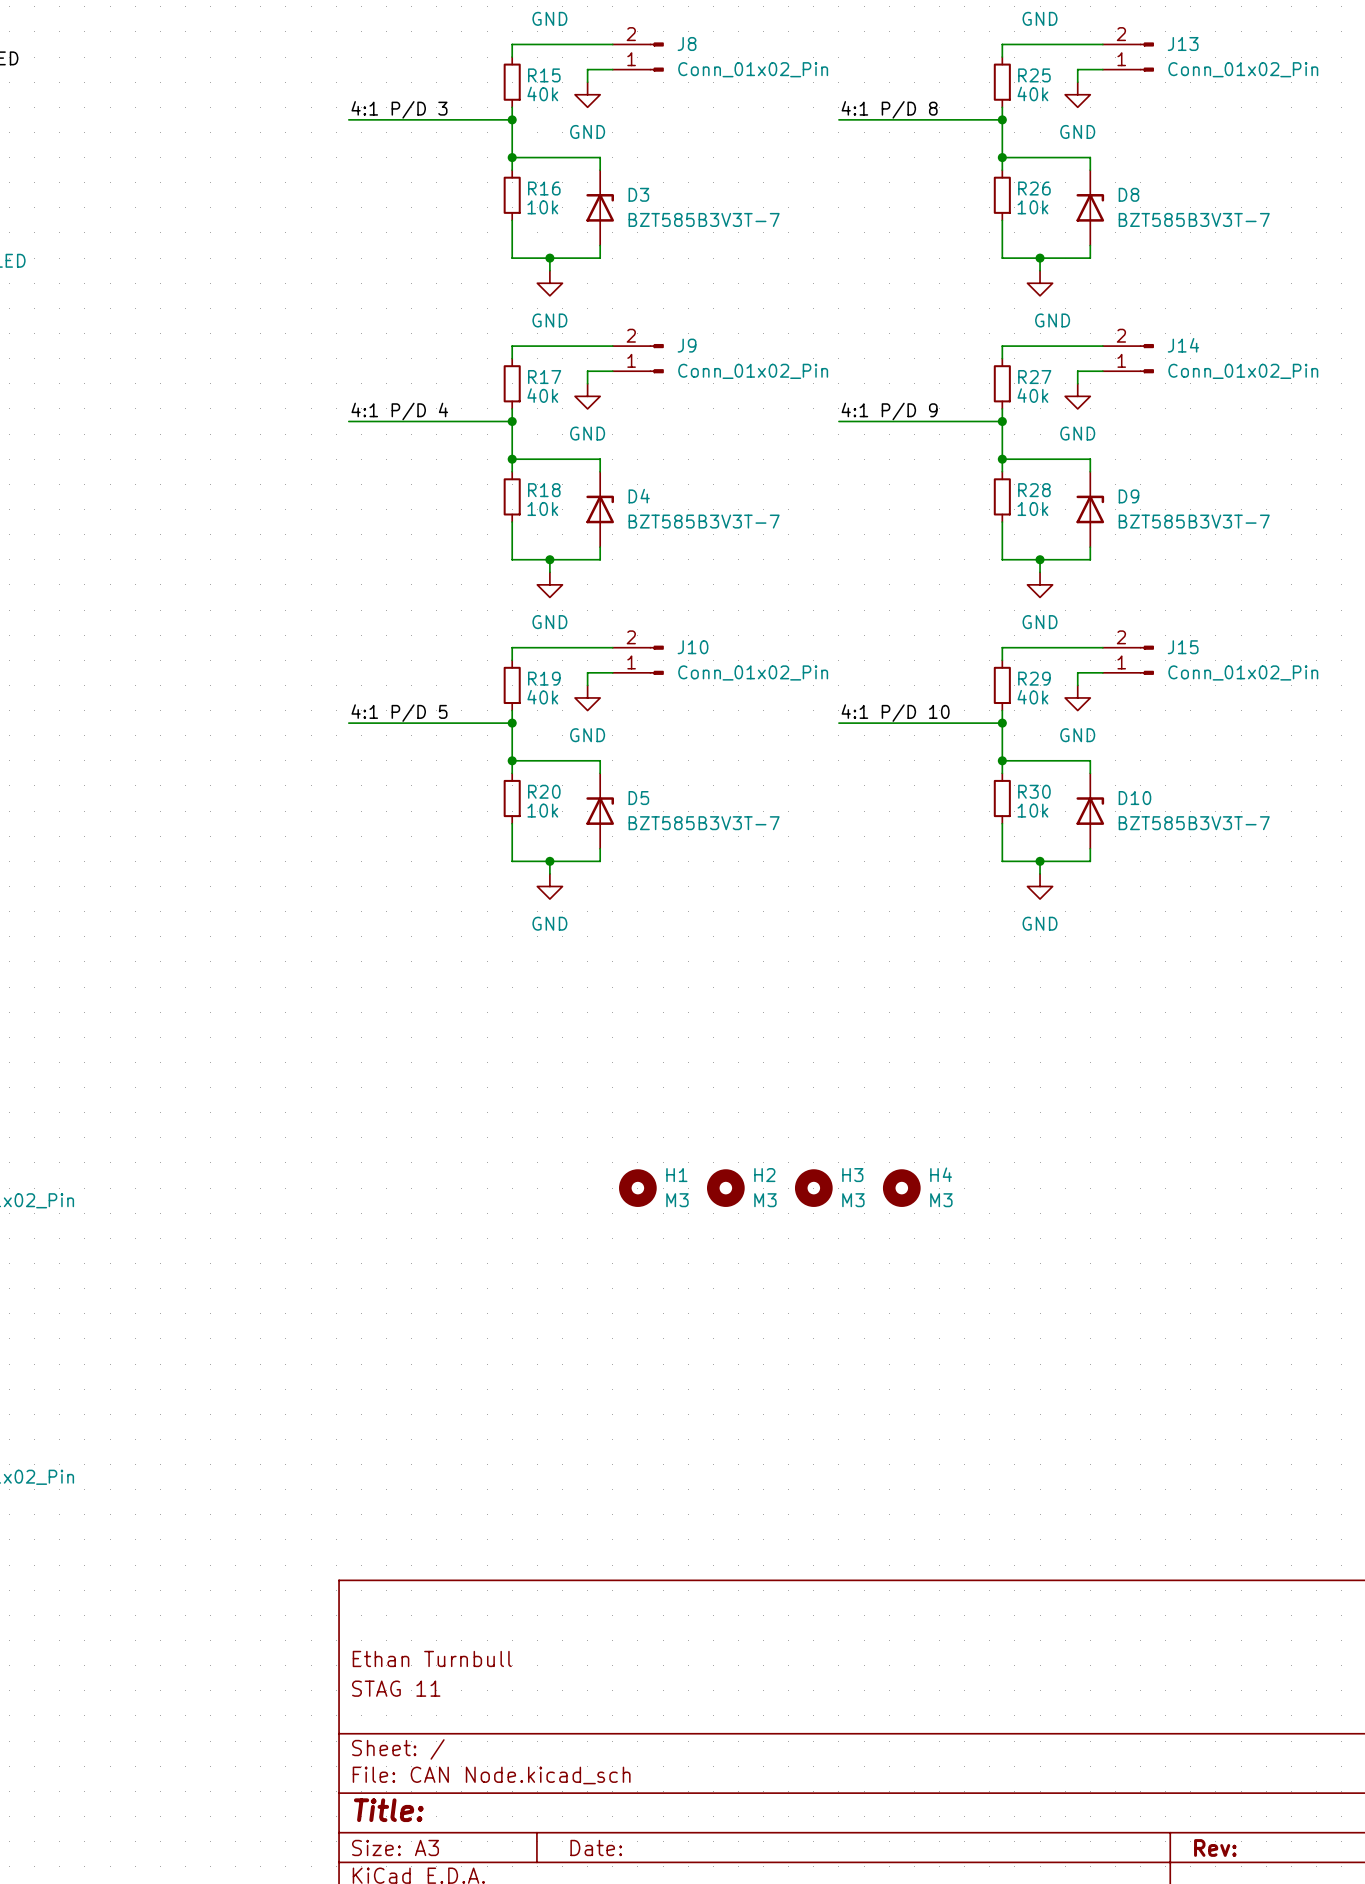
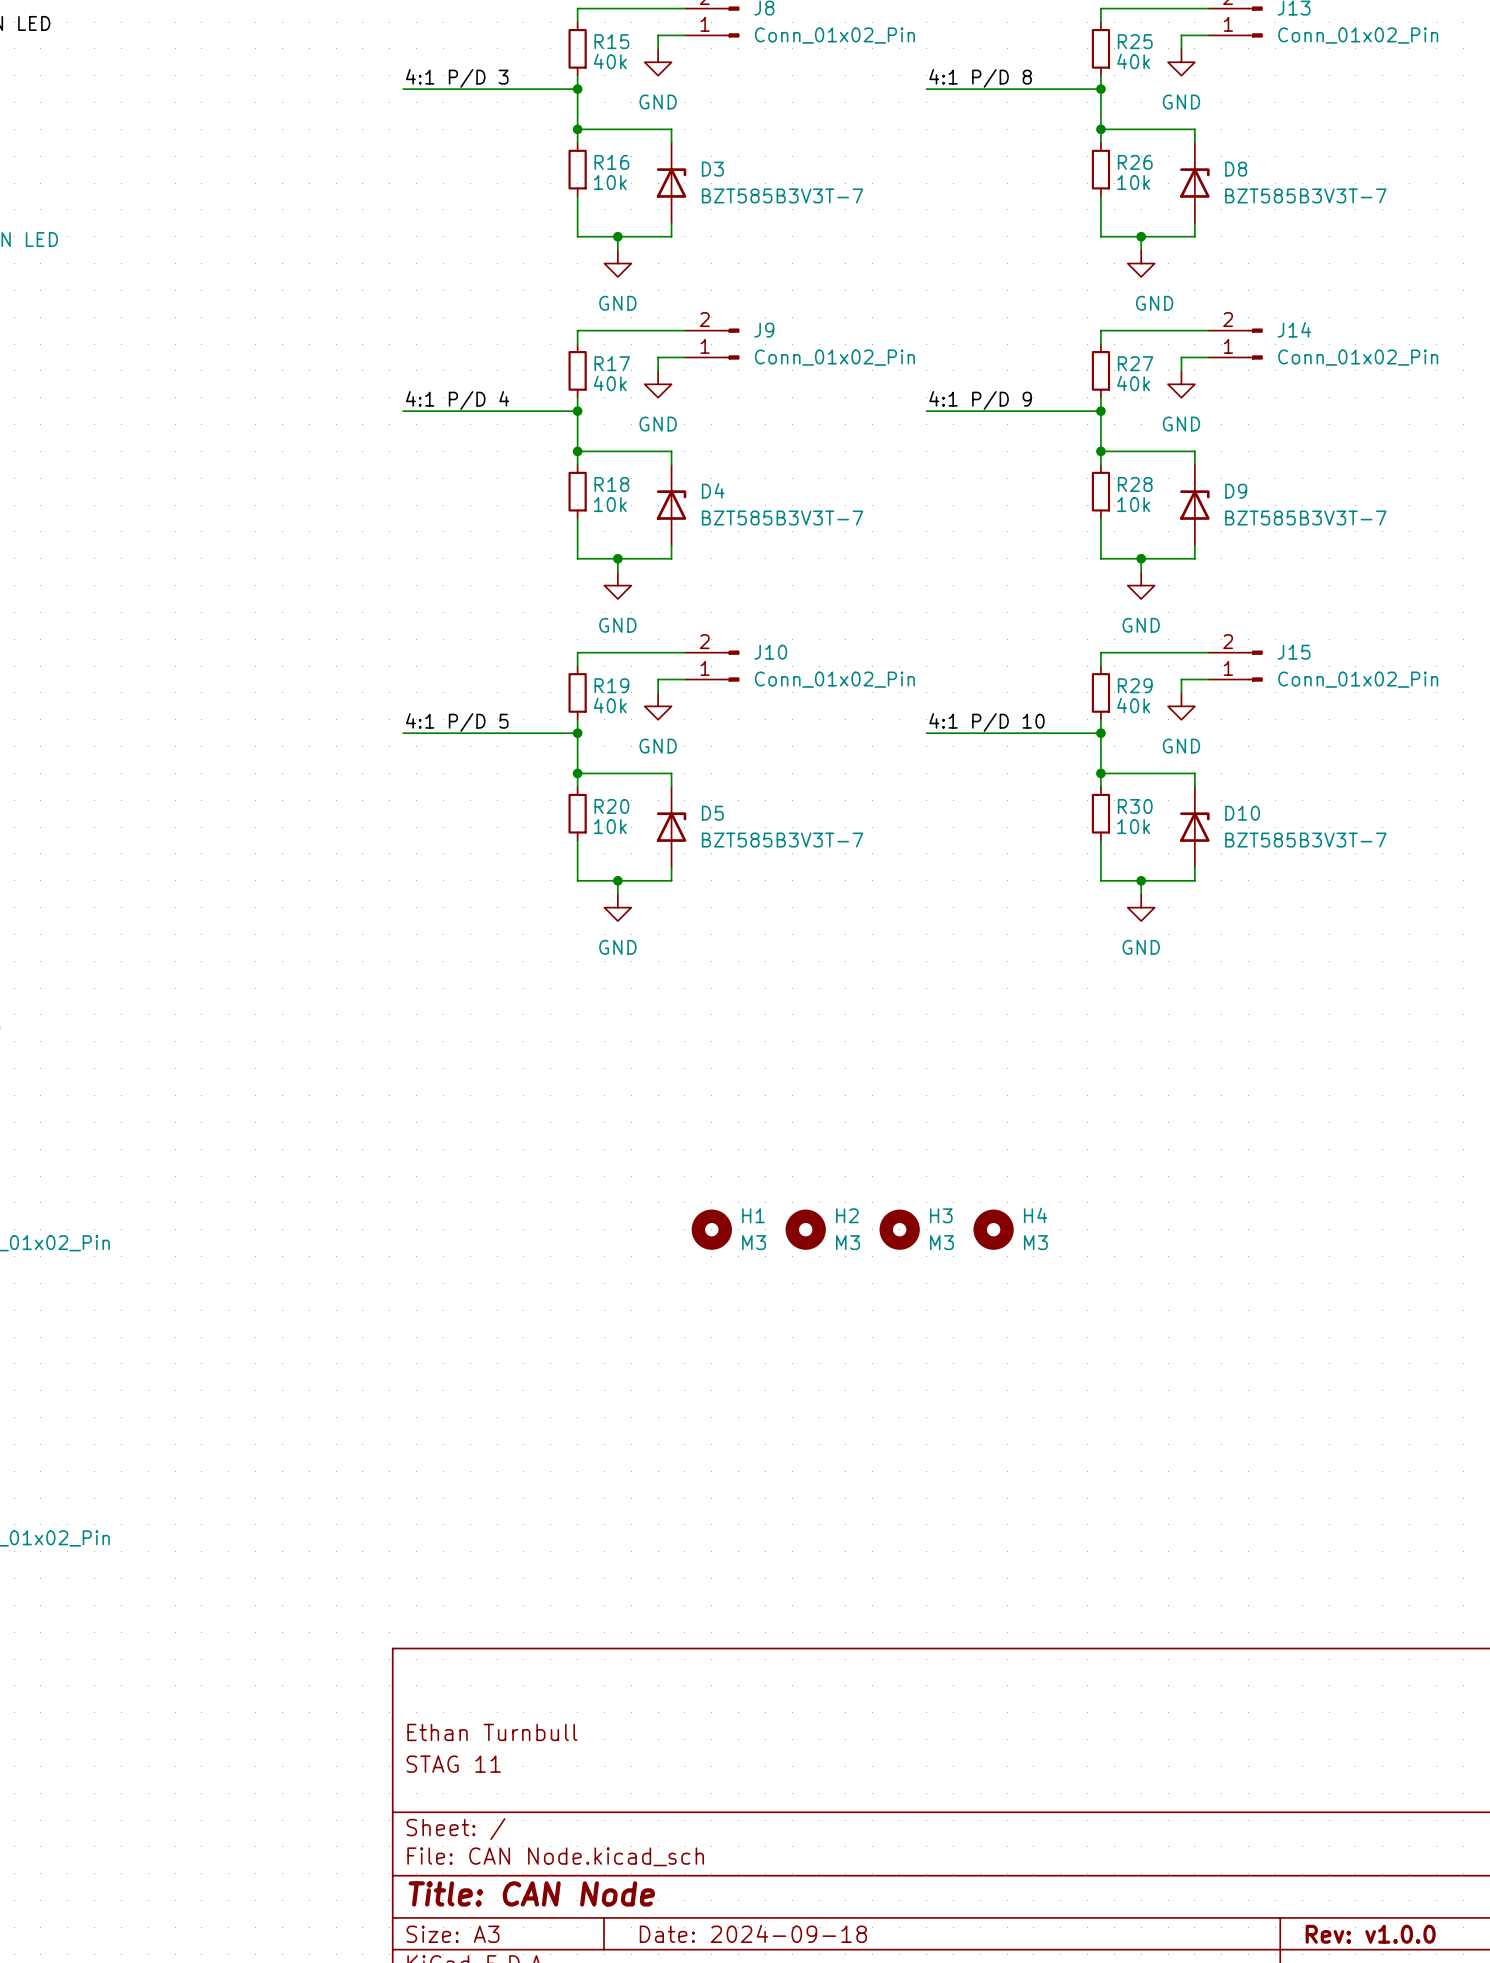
title block: Title: (388, 1810) -> Title: CAN Node (531, 1893)
title block: Date: (596, 1847) -> Date: 2024-09-18 (753, 1933)
title block: Rev: (1215, 1847) -> Rev: v1.0.0 (1370, 1934)

